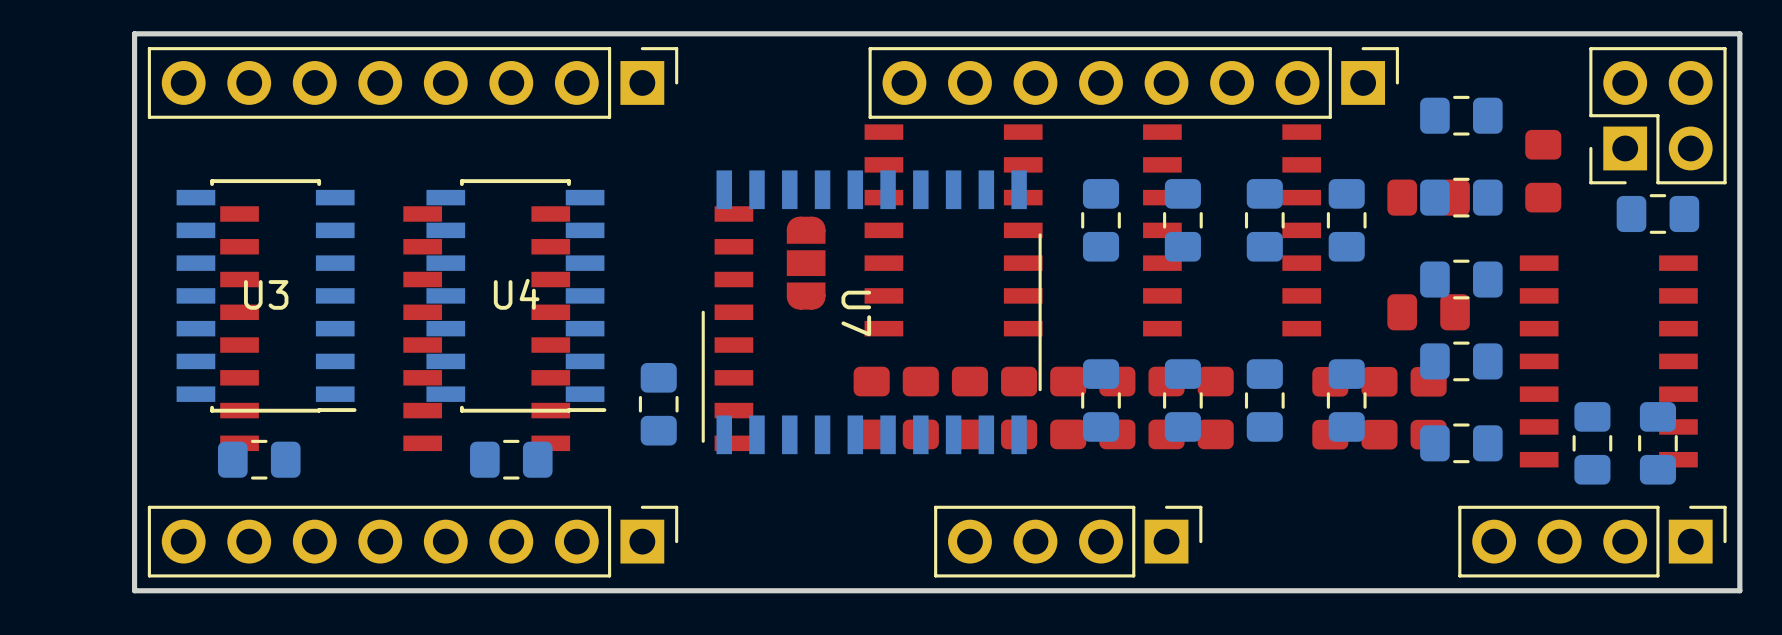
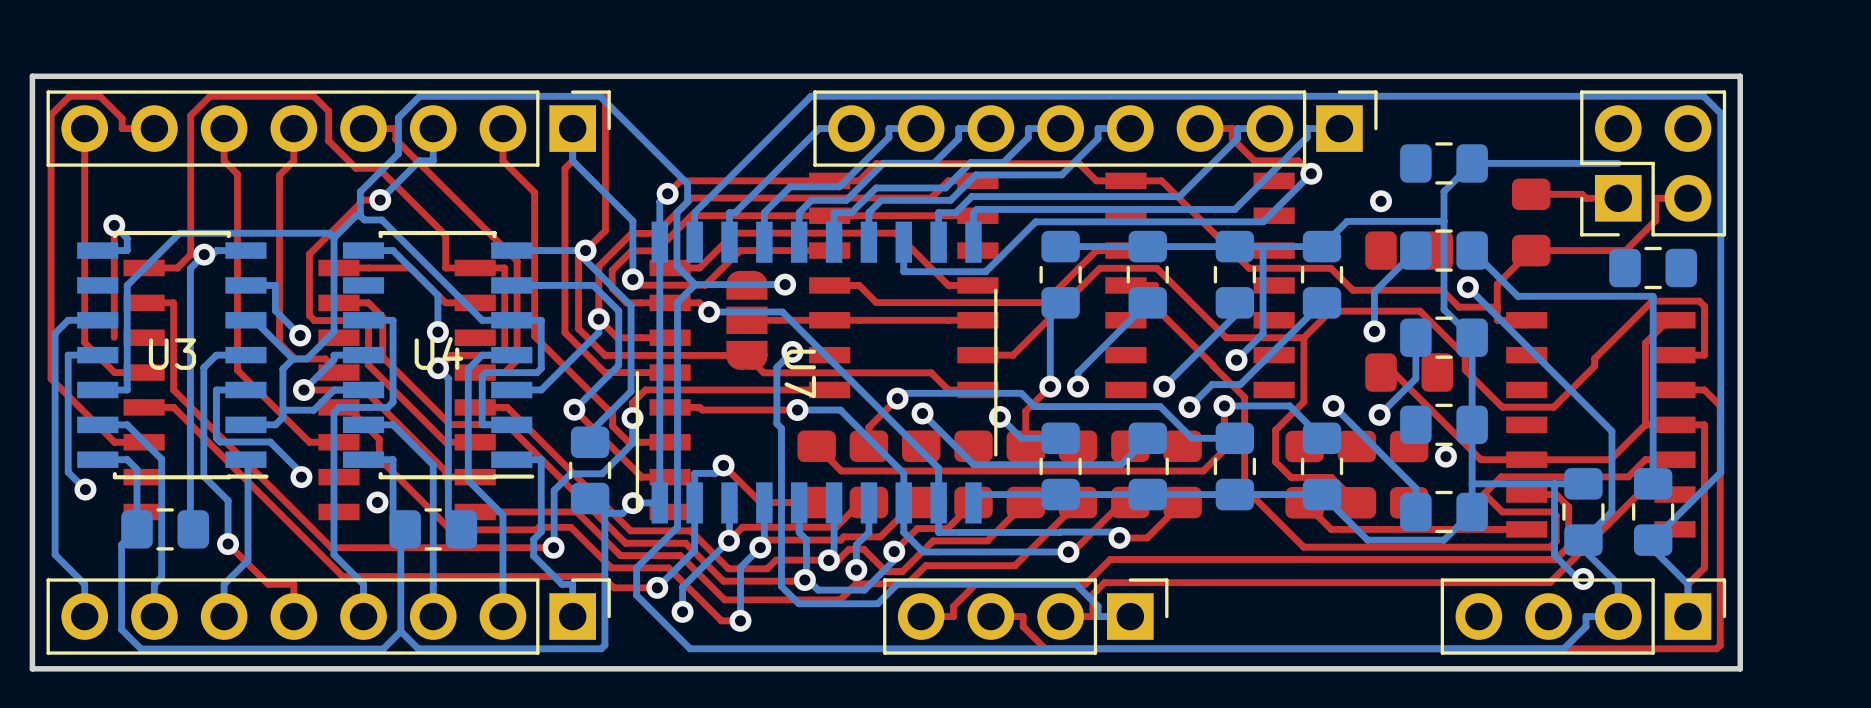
top track: none -> (605, 96) (605, 230) (578, 257) (578, 328) (605, 355) (746, 355) (763, 372) (931, 372) (948, 389) (977, 389)
top track: none -> (84, 128) (84, 342) (114, 372) (144, 372)
top track: none -> (154, 128) (122, 128) (122, 118) (99, 96) (69, 96) (51, 114) (51, 378) (114, 442) (144, 442)
top track: none -> (224, 128) (224, 160) (237, 174) (237, 370) (309, 442) (338, 442)
top track: none -> (293, 128) (293, 160) (279, 175) (279, 343) (295, 358) (325, 358) (338, 372)
top track: none -> (363, 128) (395, 128) (395, 139) (517, 260) (517, 360) (504, 372) (475, 372)
bottom track: none -> (433, 128) (433, 160) (419, 160) (380, 200)
top track: none -> (502, 128) (502, 160) (534, 192) (534, 336) (612, 414) (612, 426) (628, 442) (670, 442)
top track: none -> (572, 128) (572, 160) (564, 168) (564, 332) (604, 372) (670, 372)
bottom track: none -> (572, 128) (572, 160) (632, 221) (632, 279)
bottom track: none -> (851, 128) (819, 128) (735, 212) (729, 212) (729, 242)
bottom track: none -> (921, 128) (888, 128) (888, 137) (839, 186) (790, 186) (764, 212) (764, 242)
bottom track: none -> (990, 128) (958, 128) (958, 138) (934, 163) (883, 163) (846, 200) (811, 200) (799, 212) (799, 242)
bottom track: none -> (1060, 128) (1028, 128) (1028, 137) (1003, 162) (970, 162) (945, 187) (876, 187) (851, 212) (834, 212) (834, 242)
bottom track: none -> (1130, 128) (1098, 128) (1098, 138) (1061, 174) (975, 174) (950, 200) (881, 200) (868, 212) (868, 242)
top track: none -> (1200, 128) (1232, 128) (1232, 138) (1254, 160) (1298, 160) (1311, 173)
bottom track: none -> (1269, 128) (1237, 128) (1237, 138) (1179, 196) (971, 196) (955, 212) (938, 212) (938, 242)
bottom track: none -> (1339, 128) (1307, 128) (1307, 137) (1234, 209) (976, 209) (973, 212) (973, 242)
bottom track: none -> (1618, 163) (1472, 163) (1444, 191) (1444, 309) (1472, 337) (1472, 511) (1443, 540) (1367, 540) (1322, 494) (981, 494) (973, 502)
bottom track: none -> (1311, 173) (1263, 221) (1035, 221) (985, 271) (903, 271) (903, 242)
via: none -> (1311, 173)
top track: none -> (977, 180) (948, 180) (931, 198) (691, 198) (656, 233) (631, 233) (598, 266) (598, 319) (617, 337) (670, 337)
top track: none -> (667, 193) (680, 180) (859, 180) (876, 163) (1079, 163) (1096, 180) (1161, 180) (1249, 268) (1330, 268) (1352, 290) (1442, 290) (1458, 307) (1497, 307)
bottom track: none -> (667, 193) (659, 201) (659, 502) (633, 502) (622, 513) (604, 513)
via: none -> (667, 193)
top track: none -> (1531, 194) (1582, 194) (1586, 198) (1618, 198)
top track: none -> (1687, 198) (1655, 198) (1655, 220) (1625, 250) (1531, 250) (1497, 284) (1497, 320) (1526, 320)
top track: none -> (380, 200) (363, 200) (309, 254) (309, 315) (314, 320) (363, 320) (368, 325) (368, 365) (445, 442) (475, 442)
via: none -> (380, 200)
via: none -> (1381, 201)
bottom track: none -> (360, 215) (356, 215) (334, 237)
bottom track: none -> (360, 215) (364, 219) (381, 219) (482, 320) (541, 320) (541, 368) (537, 372) (485, 372) (482, 376) (482, 424) (511, 424)
bottom track: none -> (360, 215) (360, 191) (398, 153) (398, 117) (419, 96) (600, 96) (687, 183) (687, 202) (676, 212) (676, 266) (695, 284)
top track: none -> (977, 215) (691, 215) (656, 250) (631, 250) (612, 270) (612, 288) (626, 302) (699, 302) (708, 311)
bottom track: none -> (1444, 221) (1347, 221) (1322, 246) (1060, 246)
top track: none -> (114, 225) (114, 337)
bottom track: none -> (114, 225) (127, 238) (127, 250) (97, 250)
via: none -> (114, 225)
bottom track: none -> (334, 237) (329, 233) (179, 233) (127, 285) (127, 389) (97, 389)
bottom track: none -> (334, 237) (334, 331) (306, 358) (292, 358)
bottom track: none -> (694, 242) (694, 212) (811, 96) (1703, 96) (1720, 113) (1720, 472) (1653, 540) (1653, 549) (1687, 584) (1687, 616)
bottom track: none -> (1263, 246) (1263, 333) (1236, 360)
bottom track: none -> (245, 250) (216, 250) (212, 254) (204, 254) (190, 268) (190, 526) (193, 529)
bottom track: none -> (363, 250) (393, 250) (437, 295) (437, 332)
bottom track: none -> (511, 250) (585, 250) (585, 260) (631, 305) (631, 391) (590, 432) (590, 442)
via: none -> (585, 250)
top track: none -> (829, 250) (740, 250) (705, 285) (638, 285) (632, 279)
top track: none -> (1125, 250) (1096, 250) (1044, 302) (876, 302) (859, 285) (829, 285)
bottom track: none -> (1415, 250) (1374, 292) (1374, 331)
bottom track: none -> (1472, 250) (1517, 296) (1653, 296) (1653, 483)
top track: none -> (190, 254) (190, 115) (209, 96) (313, 96) (328, 111) (328, 141) (355, 168) (378, 168) (445, 235) (445, 268) (504, 268) (504, 349) (498, 355) (450, 355) (438, 368)
top track: none -> (190, 254) (177, 268) (144, 268)
via: none -> (204, 254)
top track: none -> (338, 268) (410, 268) (445, 302) (475, 302)
top track: none -> (670, 268) (699, 268) (734, 233) (896, 233) (948, 285) (977, 285)
via: none -> (632, 279)
bottom track: none -> (695, 284) (677, 302) (677, 527) (636, 568) (636, 595) (690, 648) (1563, 648) (1586, 626) (1586, 616) (1618, 616) (1618, 584) (1583, 549) (1583, 540) (1611, 511) (1611, 431) (1467, 287)
bottom track: none -> (785, 284) (695, 284)
via: none -> (785, 284)
bottom track: none -> (245, 285) (275, 285) (275, 310) (300, 335)
bottom track: none -> (511, 285) (593, 285) (618, 310) (618, 365) (574, 409)
top track: none -> (1125, 285) (1155, 285) (1155, 307) (1244, 397) (1244, 488) (1303, 547) (1550, 547) (1556, 541) (1556, 515) (1552, 511) (1502, 511) (1484, 493) (1501, 476) (1628, 476) (1645, 459) (1674, 459)
via: none -> (1467, 287)
top track: none -> (144, 302) (173, 302) (173, 389) (331, 547) (553, 547)
top track: none -> (338, 302) (368, 302) (382, 317) (382, 357) (450, 424) (506, 424) (625, 543) (685, 543) (723, 581) (804, 580)
bottom track: none -> (1060, 302) (1050, 313) (1050, 386)
bottom track: none -> (1147, 302) (1078, 372) (1078, 386)
bottom track: none -> (1234, 302) (1234, 315) (1164, 386)
bottom track: none -> (1322, 302) (1240, 384) (1212, 384) (1189, 407)
bottom track: none -> (709, 311) (782, 311) (938, 468) (938, 532) (1059, 532)
via: none -> (709, 311)
bottom track: none -> (598, 319) (598, 332) (541, 389) (511, 389)
via: none -> (598, 319)
bottom track: none -> (97, 320) (68, 320) (55, 333) (55, 554) (84, 584) (84, 616)
bottom track: none -> (245, 320) (254, 320) (292, 358)
bottom track: none -> (363, 320) (393, 320) (393, 402) (387, 407) (339, 407) (333, 412) (333, 554) (363, 584) (363, 616)
top track: none -> (977, 320) (746, 320)
top track: none -> (1674, 320) (1668, 320) (1645, 343) (1645, 424)
via: none -> (1374, 331)
via: none -> (437, 332)
via: none -> (300, 335)
top track: none -> (1303, 337) (1226, 337) (1156, 268) (1099, 268) (1013, 355) (977, 355)
top track: none -> (1303, 337) (1330, 311) (1420, 311) (1465, 356) (1465, 370) (1502, 407) (1553, 407) (1594, 366) (1594, 358) (1652, 301) (1699, 301) (1704, 306) (1704, 355) (1674, 355)
top track: none -> (1303, 337) (1303, 401) (1275, 430) (1275, 461) (1291, 477) (1331, 477) (1356, 502)
bottom track: none -> (1415, 337) (1415, 378) (1379, 414)
bottom track: none -> (792, 351) (776, 367) (776, 423) (781, 428) (781, 586) (798, 603) (877, 603) (897, 584) (1075, 584) (1098, 606) (1098, 616) (1130, 616)
via: none -> (792, 351)
bottom track: none -> (97, 355) (68, 355) (68, 472) (85, 489)
bottom track: none -> (245, 355) (216, 355) (203, 367) (203, 476) (228, 500) (228, 544)
bottom track: none -> (363, 355) (334, 355) (334, 359) (303, 390)
bottom track: none -> (511, 355) (482, 355) (468, 369) (468, 480) (502, 515) (502, 616)
bottom track: none -> (292, 358) (282, 368) (282, 417) (275, 424) (245, 424)
via: none -> (1236, 360)
bottom track: none -> (438, 368) (448, 378) (448, 516) (461, 529)
via: none -> (438, 368)
top track: none -> (1381, 372) (1393, 372) (1480, 459) (1610, 459) (1645, 424)
top track: none -> (1050, 386) (1025, 411) (1025, 446)
via: none -> (1050, 386)
via: none -> (1078, 386)
via: none -> (1164, 386)
bottom track: none -> (245, 389) (216, 389) (216, 438) (220, 442) (270, 442) (301, 473) (301, 477)
top track: none -> (303, 390) (364, 390) (445, 471) (445, 477) (475, 477)
via: none -> (303, 390)
bottom track: none -> (363, 389) (334, 389) (313, 410) (282, 410)
top track: none -> (829, 389) (645, 389) (632, 402) (632, 418)
top track: none -> (1674, 389) (1704, 389) (1720, 405) (1720, 645) (1716, 648) (1045, 648) (1023, 626) (1023, 616) (990, 616)
top track: none -> (897, 398) (868, 427) (868, 446)
bottom track: none -> (897, 398) (902, 393) (1021, 393) (1034, 406) (1160, 406) (1191, 438) (1234, 438)
via: none -> (897, 398)
top track: none -> (1224, 405) (1224, 449) (1203, 470) (841, 470) (816, 446)
bottom track: none -> (1224, 405) (1289, 405) (1322, 438)
via: none -> (1224, 405)
bottom track: none -> (1333, 406) (1415, 488) (1415, 511)
via: none -> (1333, 406)
via: none -> (1189, 407)
top track: none -> (144, 407) (173, 407) (342, 576) (602, 576) (613, 587) (657, 587)
top track: none -> (338, 407) (347, 407) (379, 439) (379, 458) (450, 529) (536, 529) (538, 527) (570, 527) (611, 567) (668, 567) (721, 620) (740, 620)
top track: none -> (475, 407) (507, 407) (630, 530) (690, 530) (728, 568) (767, 568) (775, 560) (828, 560)
top track: none -> (670, 407) (699, 407) (702, 410) (797, 410)
top track: none -> (574, 409) (640, 477) (670, 477)
via: none -> (574, 409)
bottom track: none -> (797, 410) (840, 410) (903, 473) (903, 532) (923, 551) (1068, 551)
via: none -> (797, 410)
bottom track: none -> (922, 413) (973, 464) (1121, 464) (1147, 438)
via: none -> (922, 413)
via: none -> (1379, 414)
bottom track: none -> (999, 416) (1021, 438) (1060, 438)
via: none -> (999, 416)
bottom track: none -> (632, 418) (632, 443) (602, 473) (570, 473) (554, 490) (553, 547)
via: none -> (632, 418)
bottom track: none -> (97, 424) (127, 424) (161, 459) (161, 576) (154, 584) (154, 616)
bottom track: none -> (363, 424) (393, 424) (433, 465) (433, 616)
top track: none -> (1645, 424) (1704, 424) (1704, 567) (1687, 584) (1687, 616)
via: none -> (1445, 456)
bottom track: none -> (97, 459) (127, 459) (136, 469) (136, 529) (121, 544) (121, 629) (141, 649) (383, 649) (400, 631)
bottom track: none -> (245, 459) (247, 461) (247, 560) (224, 584) (224, 616)
bottom track: none -> (363, 459) (393, 459) (393, 517) (405, 529) (400, 533) (400, 631)
bottom track: none -> (511, 459) (541, 459) (541, 531) (533, 539) (533, 555) (562, 584) (572, 584) (572, 616)
top track: none -> (723, 465) (760, 502) (816, 502)
bottom track: none -> (723, 465) (715, 473) (694, 473) (694, 550) (657, 587)
via: none -> (723, 465)
via: none -> (301, 477)
bottom track: none -> (1554, 483) (1554, 555) (1578, 578) (1583, 578)
bottom track: none -> (1583, 483) (1472, 483)
via: none -> (85, 489)
top track: none -> (1526, 494) (1556, 494) (1568, 506) (1568, 546) (1555, 559) (1110, 559) (1085, 584) (975, 584) (953, 606) (953, 616) (921, 616)
top track: none -> (1674, 494) (1638, 494) (1549, 582) (1104, 582) (1092, 594) (1092, 616) (1060, 616)
via: none -> (377, 502)
bottom track: none -> (729, 502) (728, 540) (682, 587) (682, 611)
bottom track: none -> (764, 502) (764, 543) (740, 567) (740, 620)
bottom track: none -> (799, 502) (799, 532) (806, 539) (806, 578)
bottom track: none -> (834, 502) (834, 555) (828, 560)
top track: none -> (868, 502) (860, 502) (836, 527) (742, 527) (728, 540)
bottom track: none -> (868, 502) (868, 532) (856, 545) (856, 570)
top track: none -> (921, 502) (914, 502) (880, 536) (843, 536) (840, 540) (767, 540) (760, 547)
top track: none -> (973, 502) (947, 528) (917, 528) (894, 551)
top track: none -> (1025, 502) (987, 540) (933, 540) (902, 571) (886, 571) (863, 549) (848, 549) (837, 560) (828, 560)
top track: none -> (1078, 502) (1014, 565) (925, 565) (907, 583) (856, 583)
top track: none -> (1130, 502) (1122, 502) (1072, 551) (1068, 551)
top track: none -> (1182, 502) (1147, 537) (1119, 537)
top track: none -> (1304, 502) (1331, 529) (1526, 529)
via: none -> (632, 503)
top track: none -> (475, 511) (576, 511) (620, 555) (680, 555) (724, 599) (840, 599) (856, 583) (856, 570)
bottom track: none -> (604, 513) (604, 645) (601, 648) (418, 648) (400, 631)
bottom track: none -> (1060, 532) (1113, 532) (1119, 537)
via: none -> (1119, 537)
via: none -> (728, 540)
top track: none -> (228, 544) (268, 584) (293, 584) (293, 616)
via: none -> (228, 544)
via: none -> (553, 547)
via: none -> (760, 547)
bottom track: none -> (894, 551) (894, 560) (864, 590) (818, 590) (806, 578)
via: none -> (894, 551)
via: none -> (1068, 551)
via: none -> (828, 560)
via: none -> (856, 570)
via: none -> (1583, 578)
via: none -> (804, 580)
via: none -> (657, 587)
via: none -> (682, 611)
via: none -> (740, 620)

